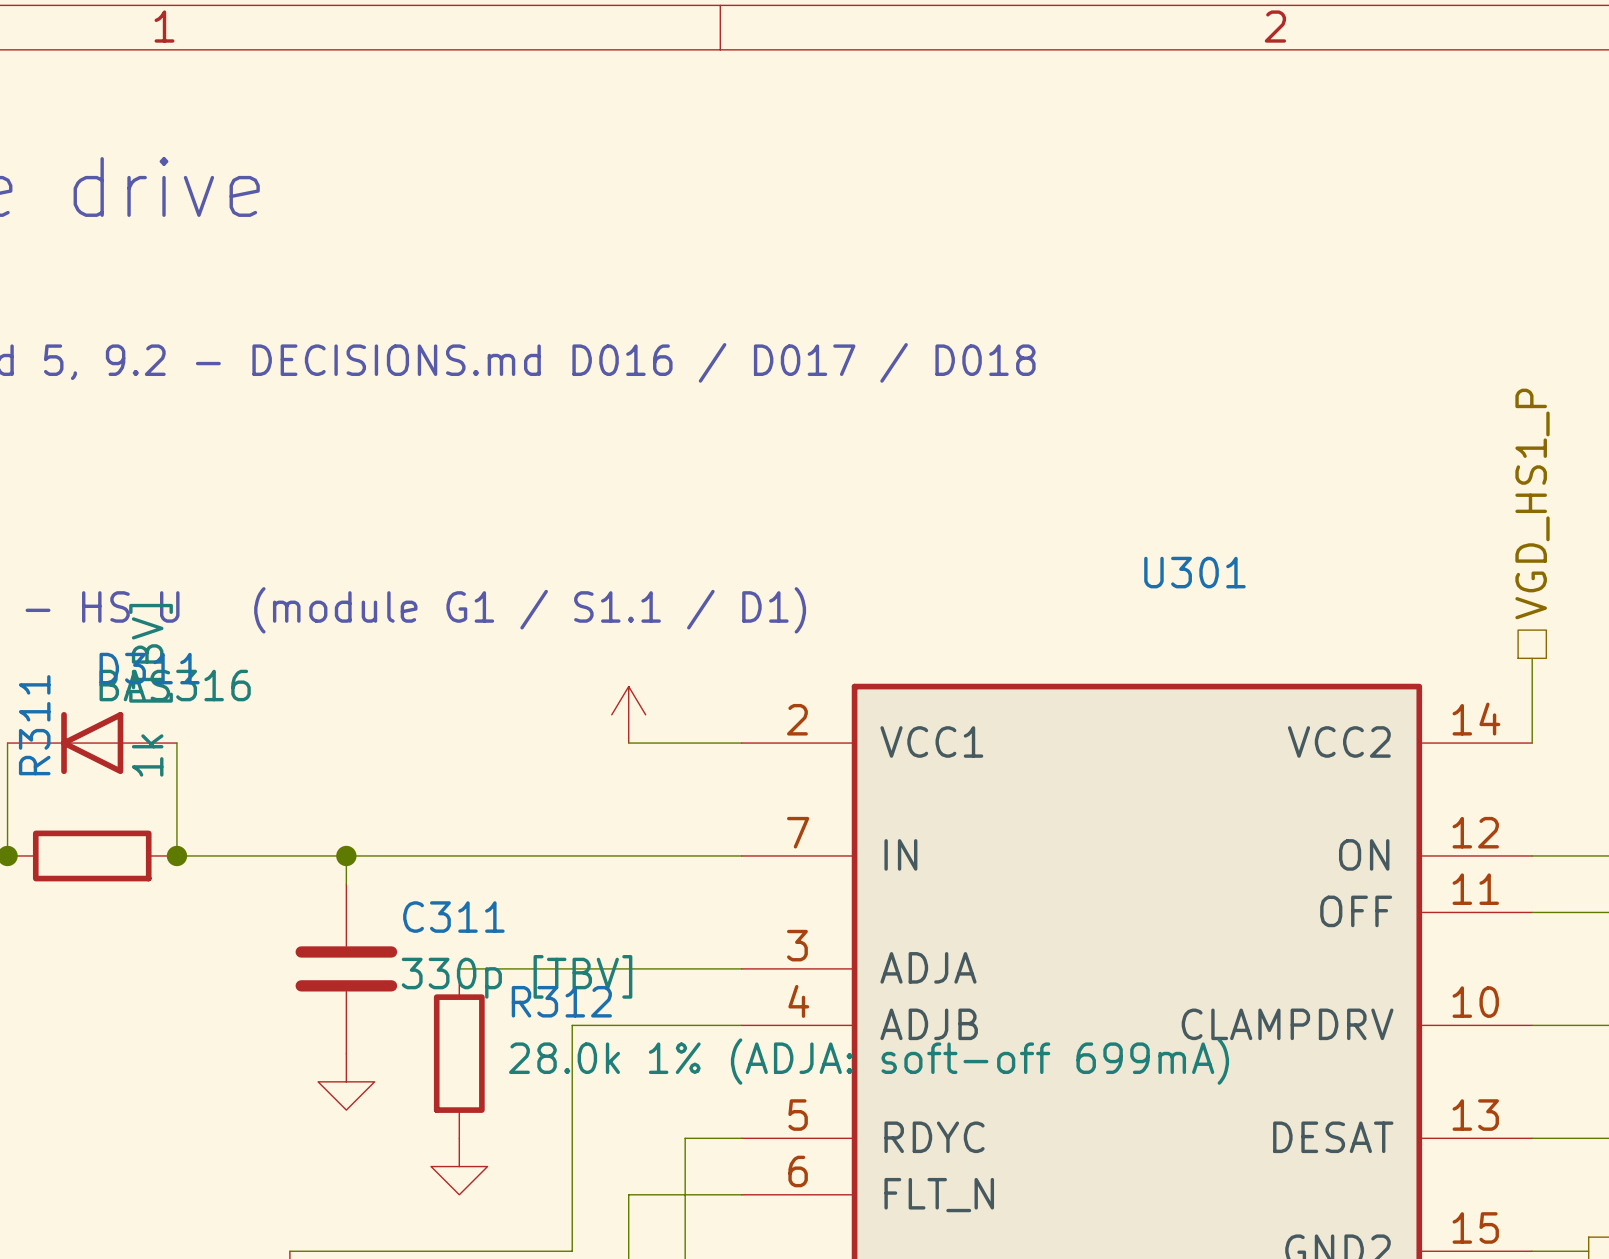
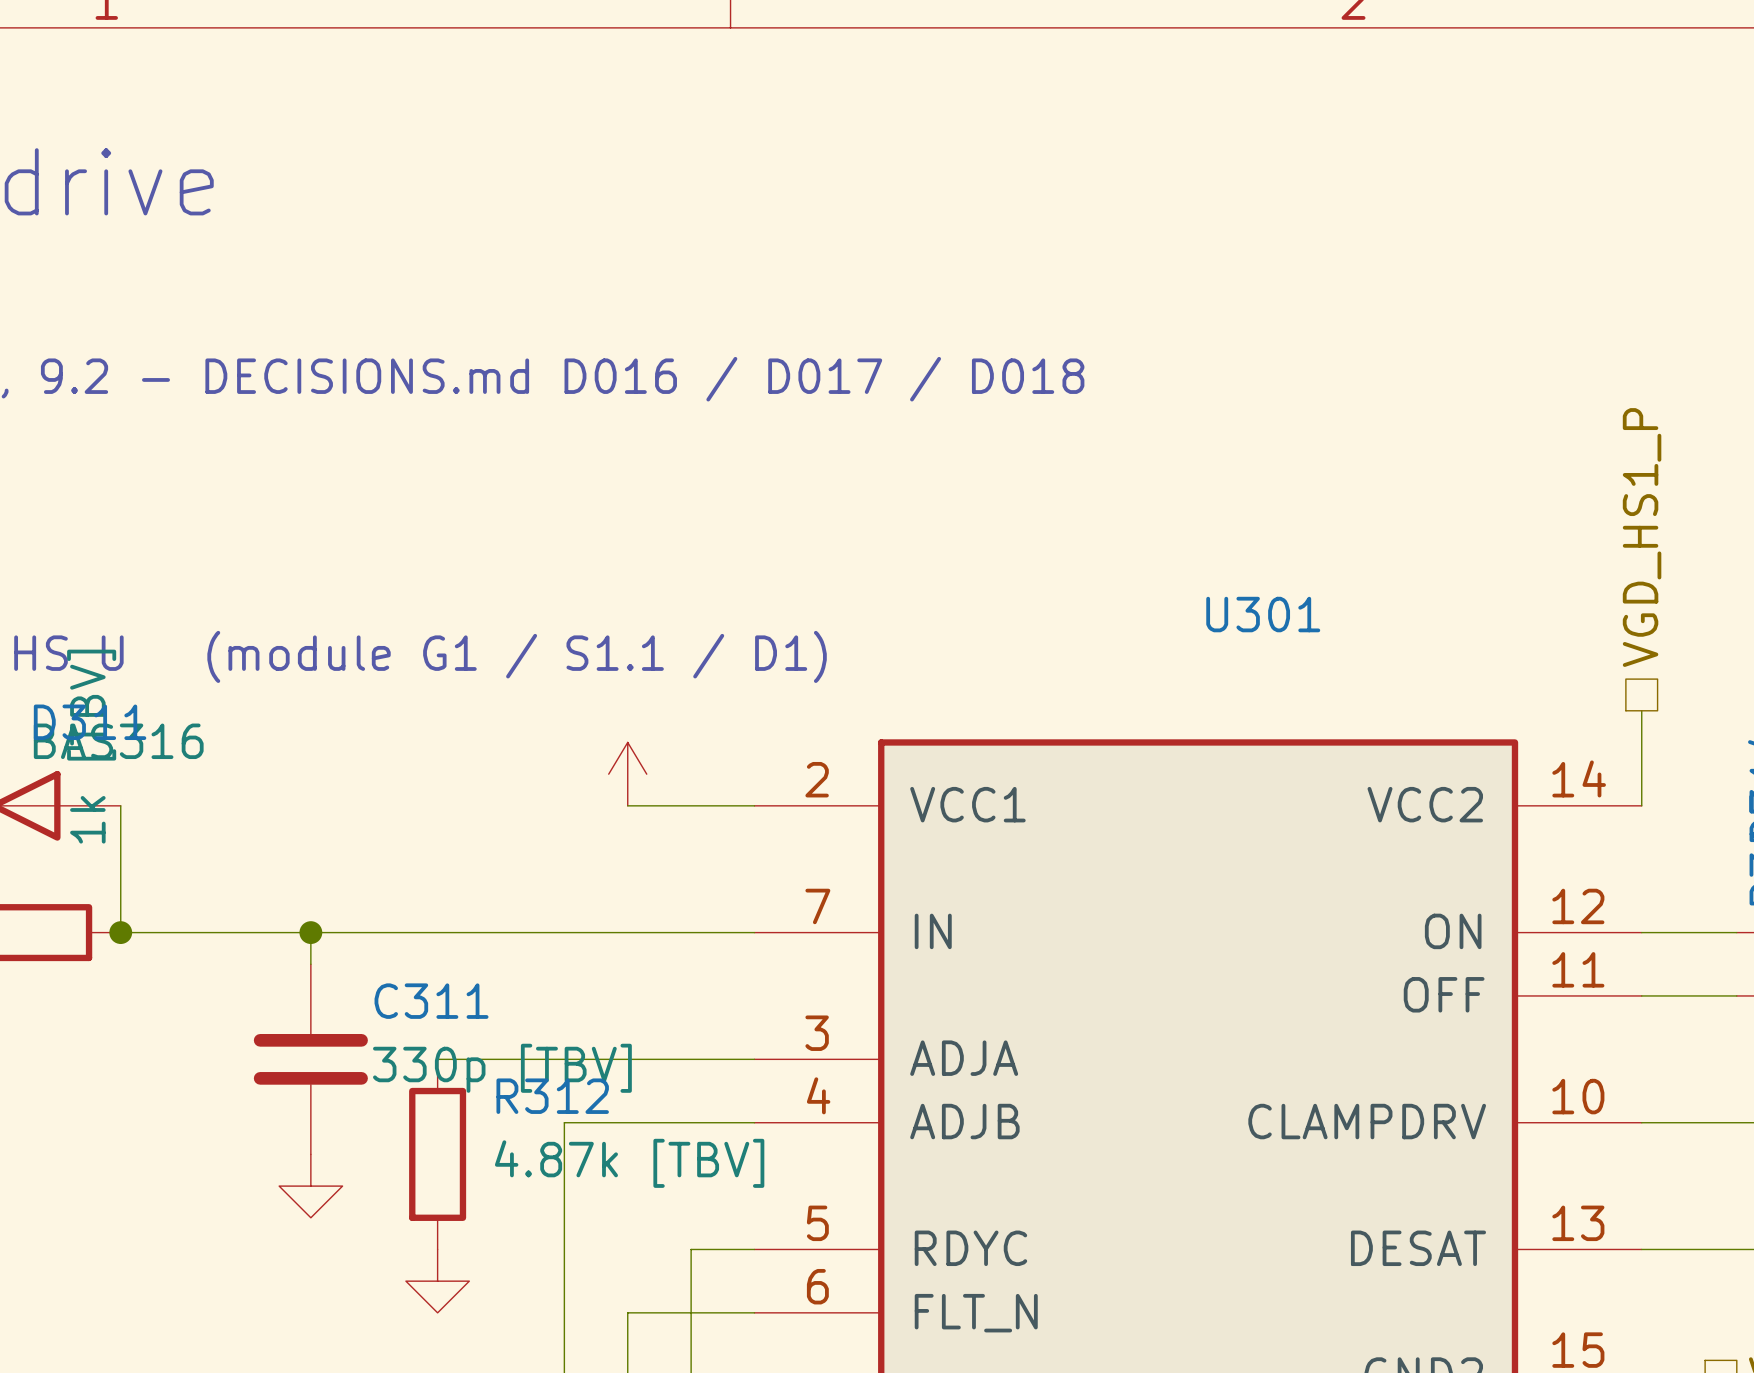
R312 value: 28.0k 1% (ADJA: soft-off 699mA) (869, 1061) -> 4.87k [TBV] (629, 1163)

